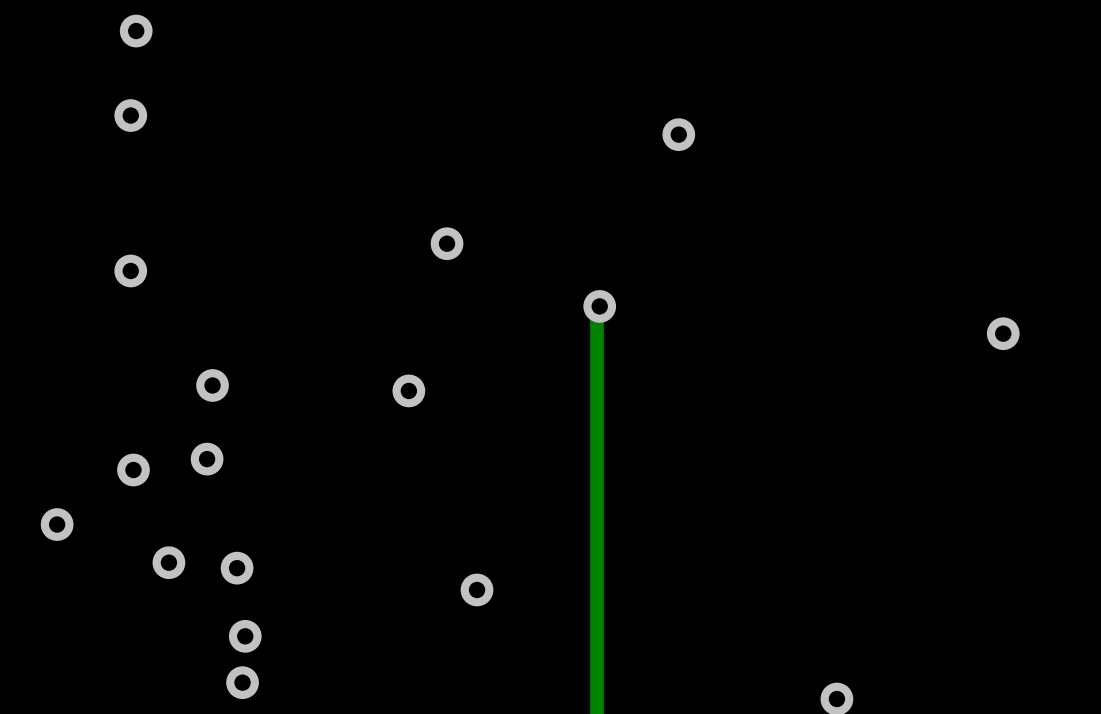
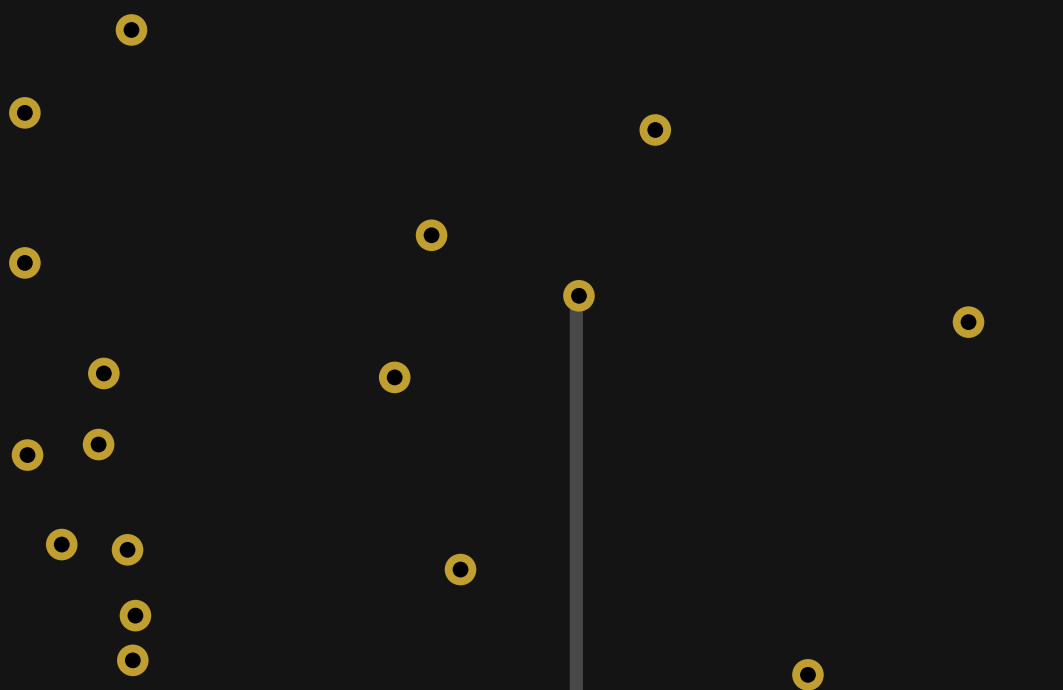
via: (130, 115) -> none
via: none -> (24, 112)
via: (130, 270) -> none
via: none -> (24, 262)
via: (212, 385) -> none
via: none -> (103, 373)
via: (207, 459) -> none
via position: (133, 470) -> (98, 444)
via: none -> (27, 455)
via: (57, 524) -> none
via position: (168, 562) -> (127, 549)
via: none -> (61, 544)
via: (237, 568) -> none
via: (245, 636) -> none
via: none -> (135, 615)
via: (242, 682) -> none
via: none -> (132, 660)

